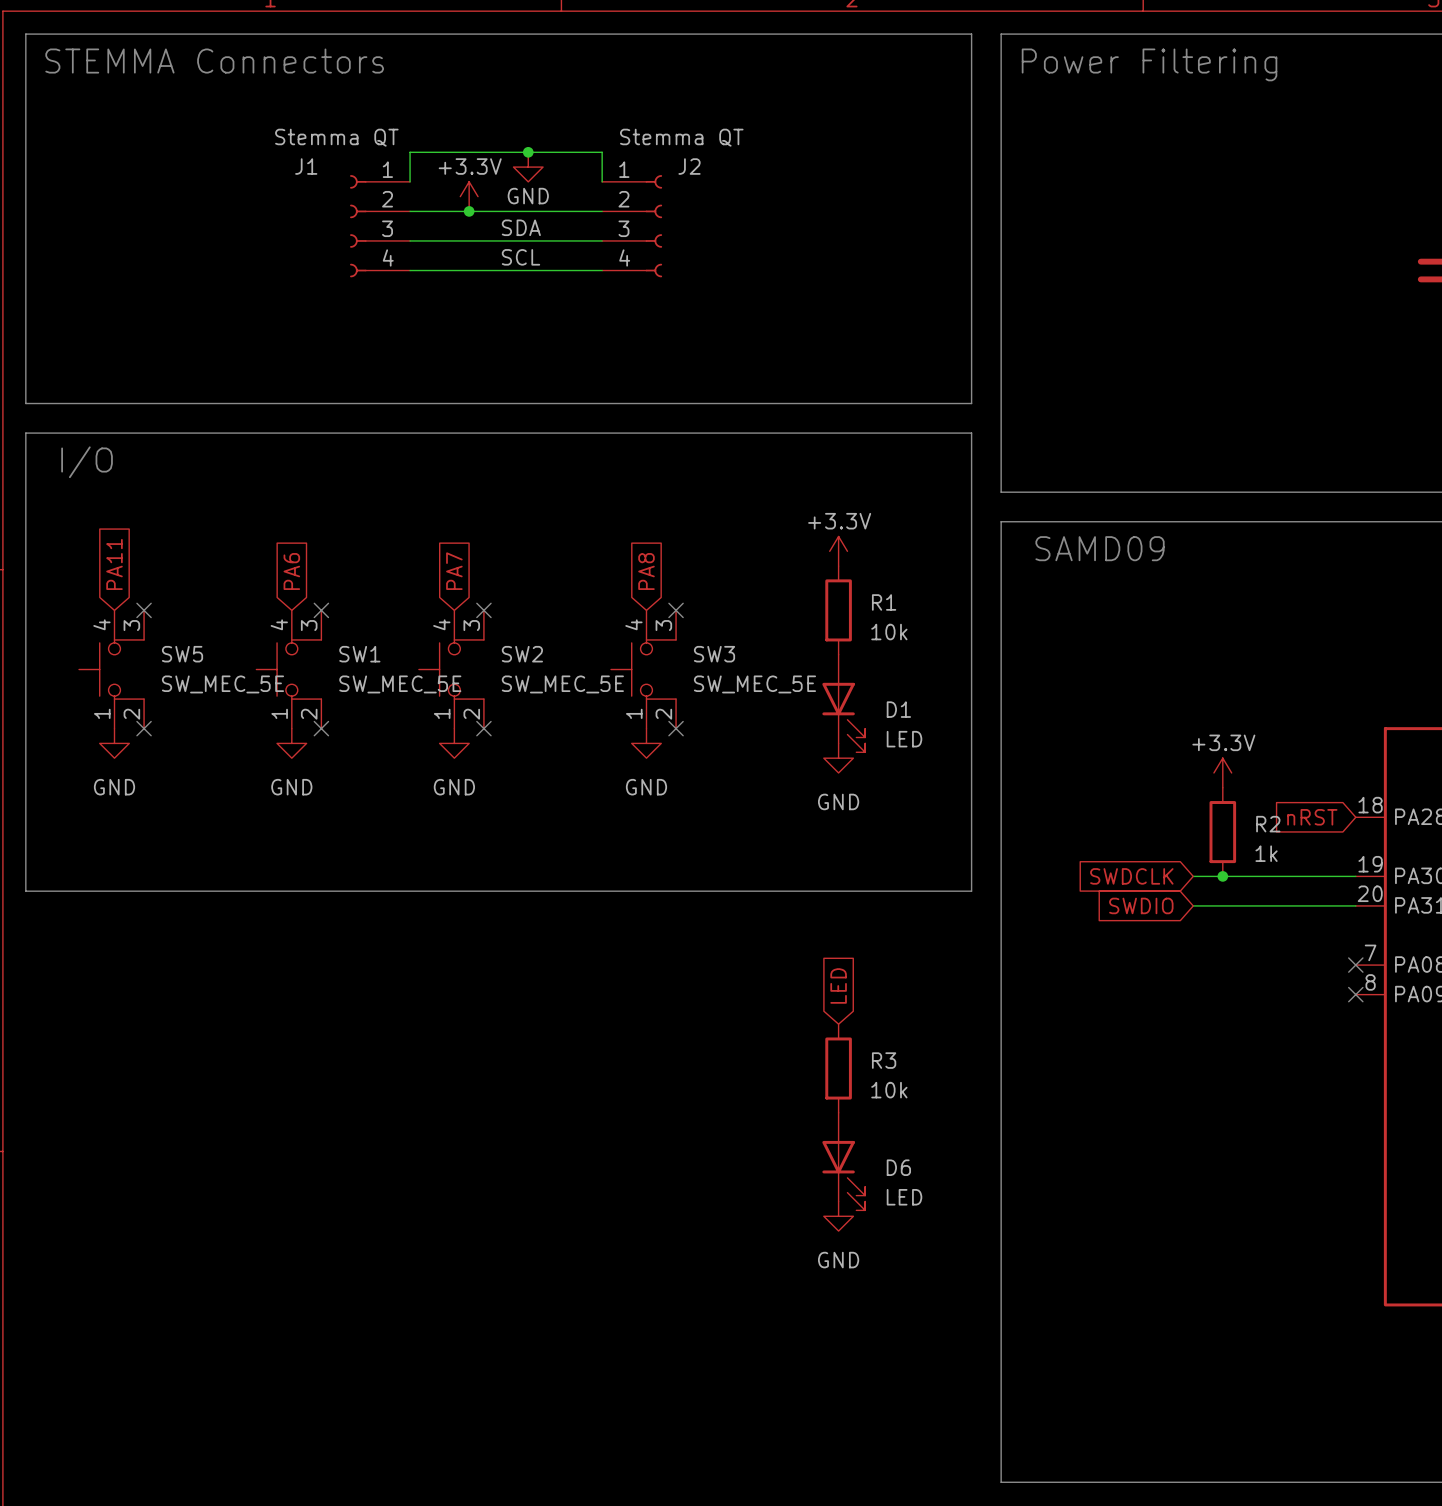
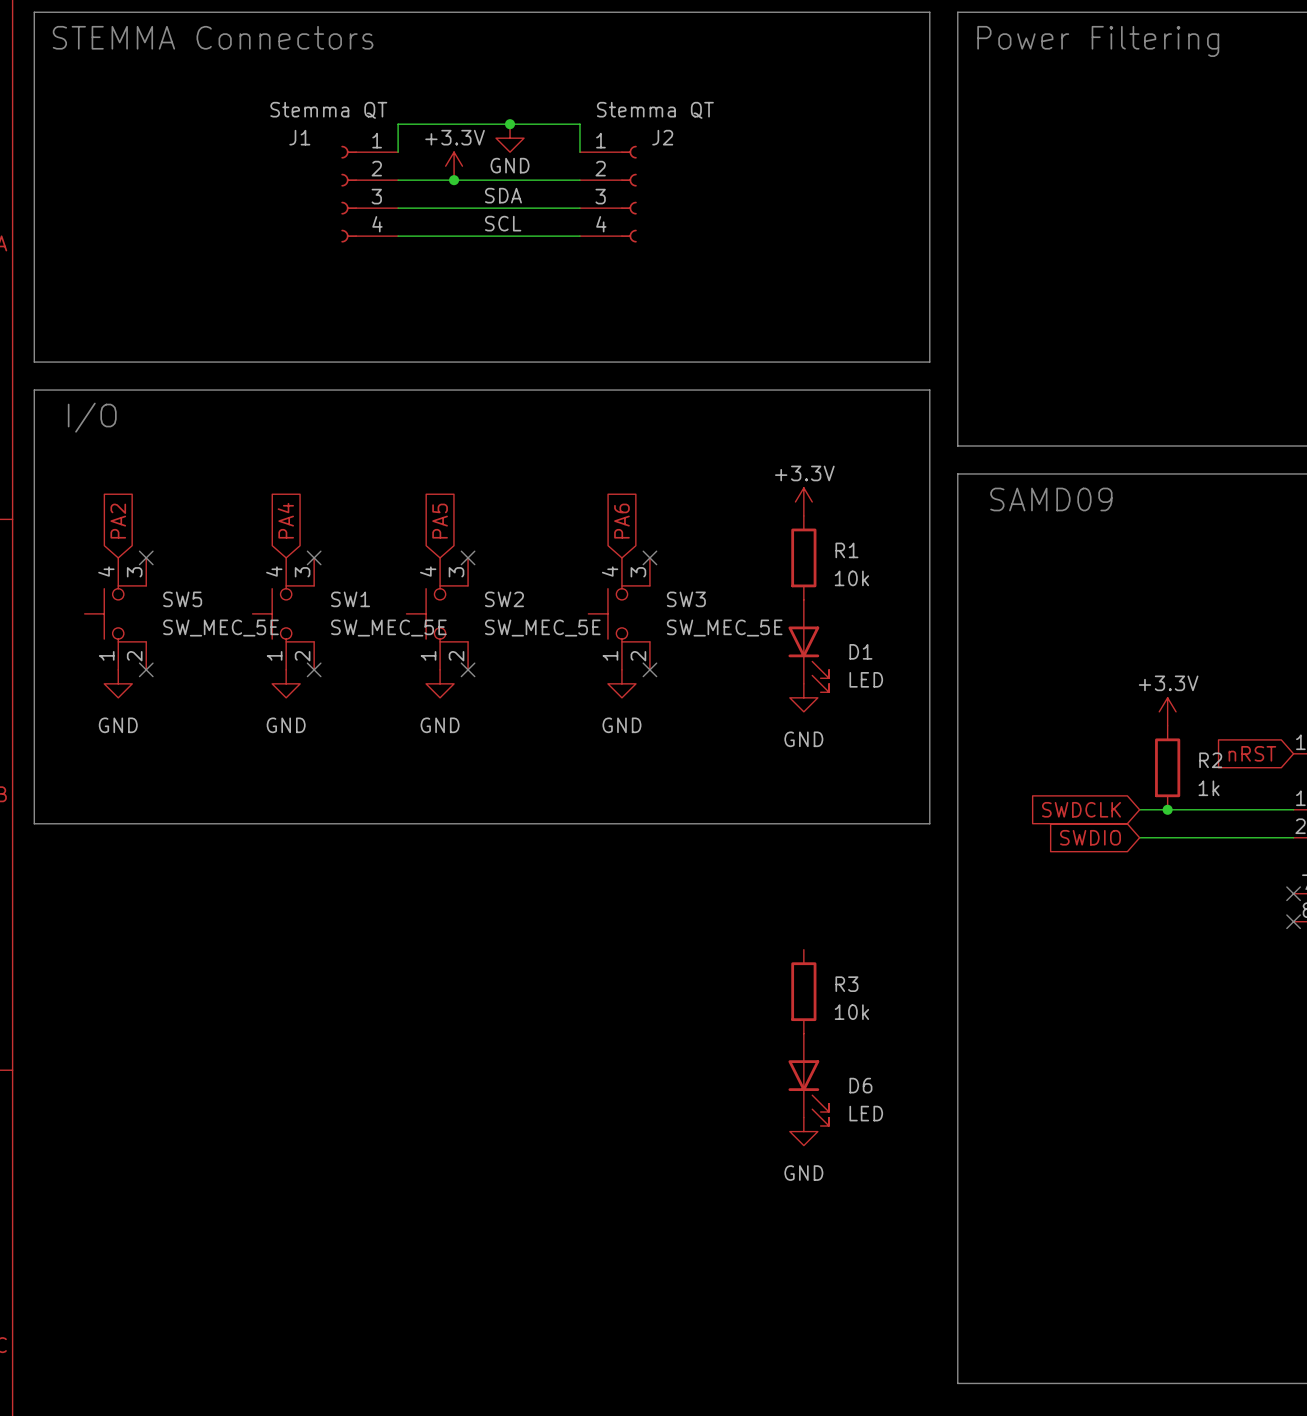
global label: PA11 (114, 564) -> PA2 (118, 521)
global label: PA6 (291, 571) -> PA4 (285, 520)
global label: PA7 (454, 571) -> PA5 (440, 521)
global label: PA8 (646, 571) -> PA6 (621, 521)
global label: LED (838, 985) -> none

